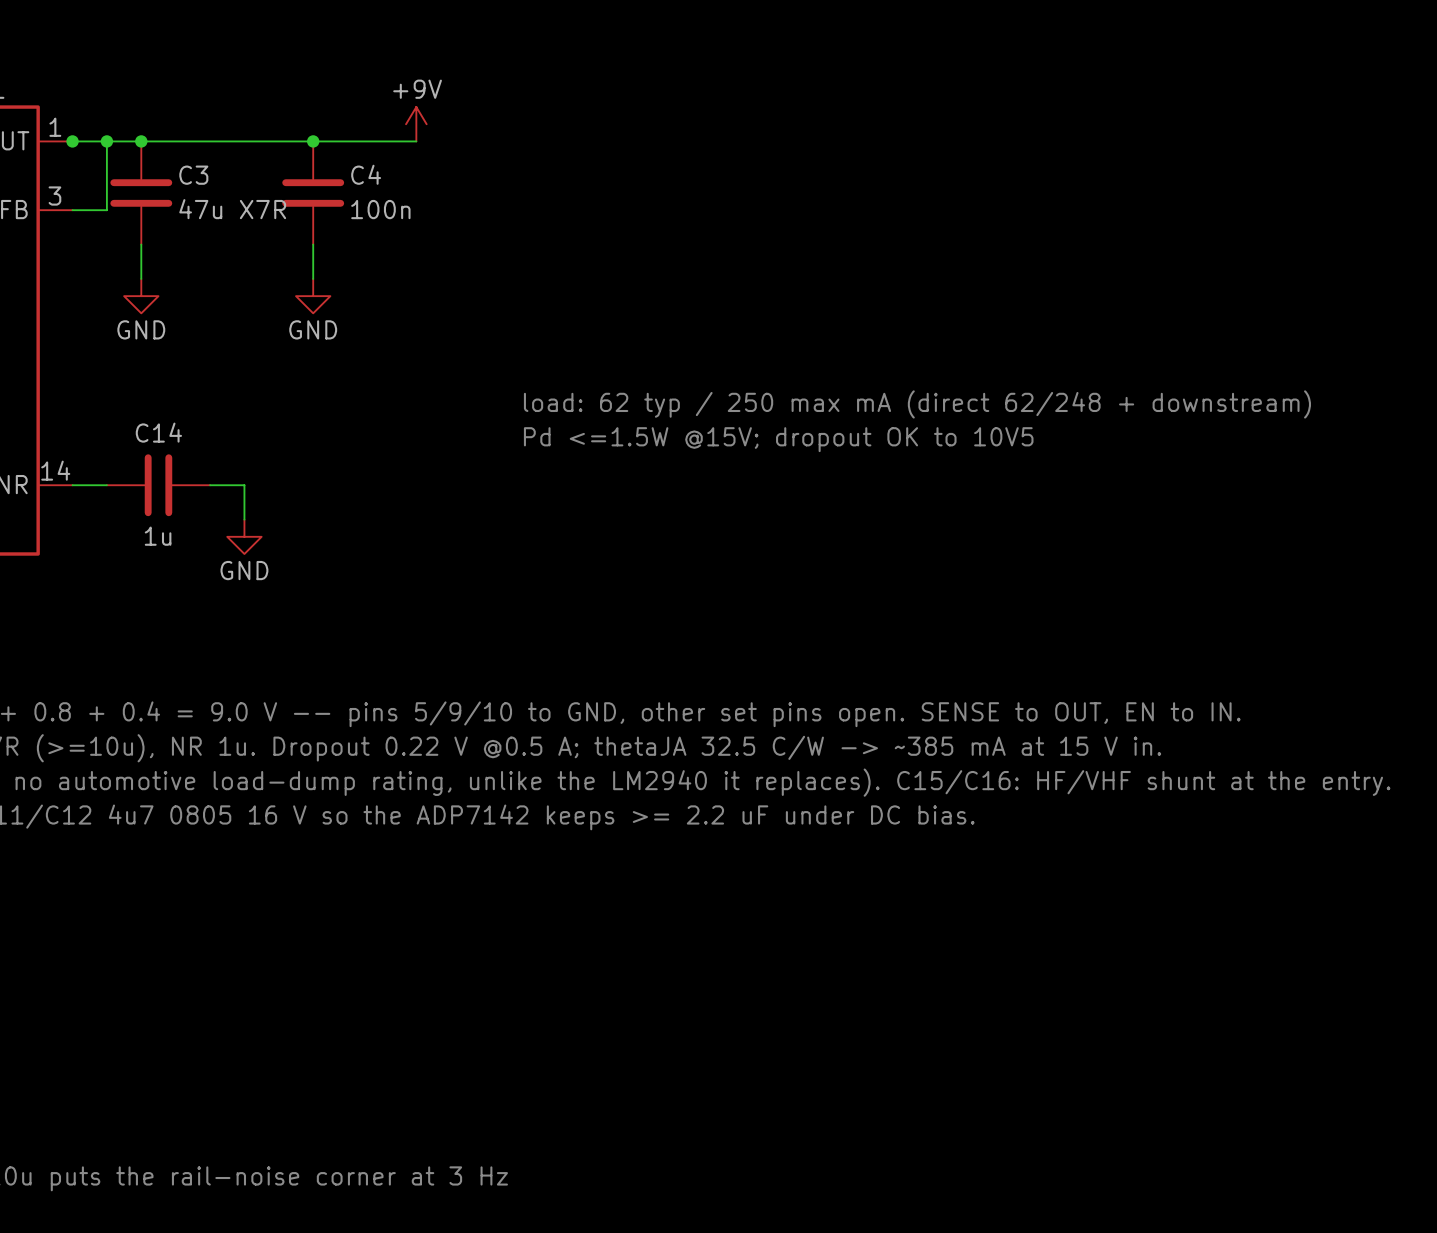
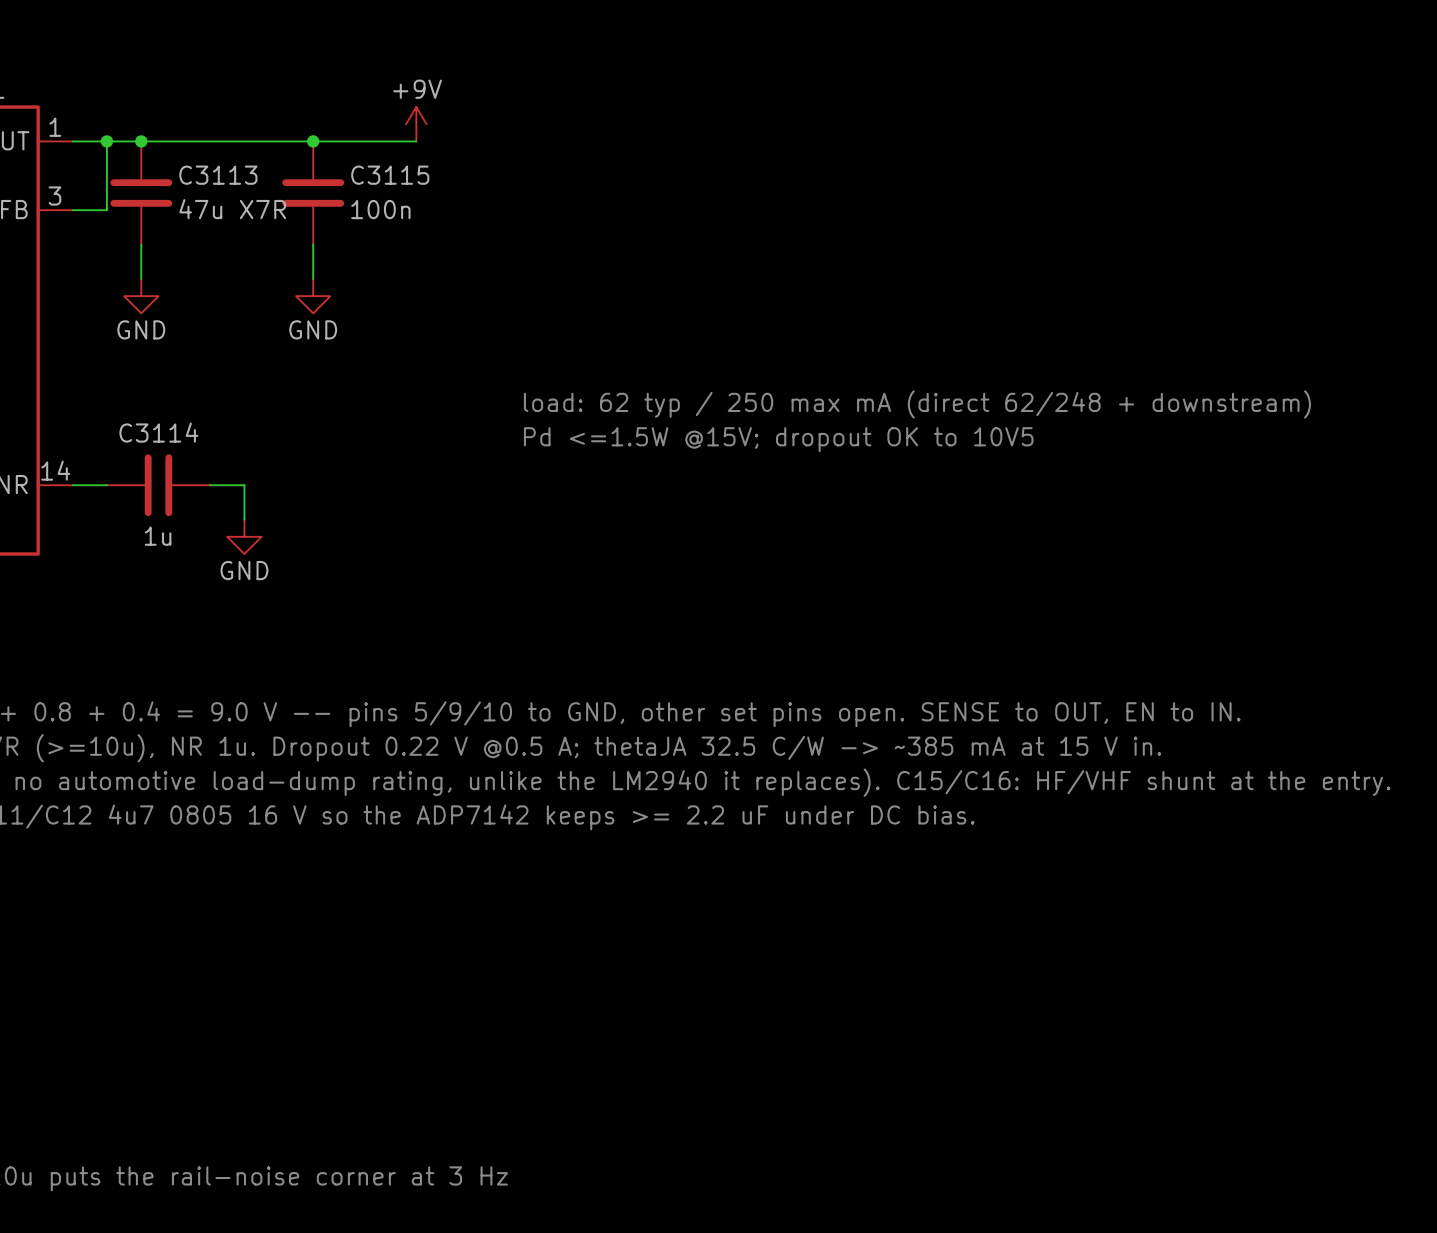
junction: (72, 141) -> none
C4 name: C4 (366, 174) -> C3115 (390, 175)
C3 name: C3 (193, 175) -> C3113 (218, 175)
C14 name: C14 (158, 432) -> C3114 (158, 432)

